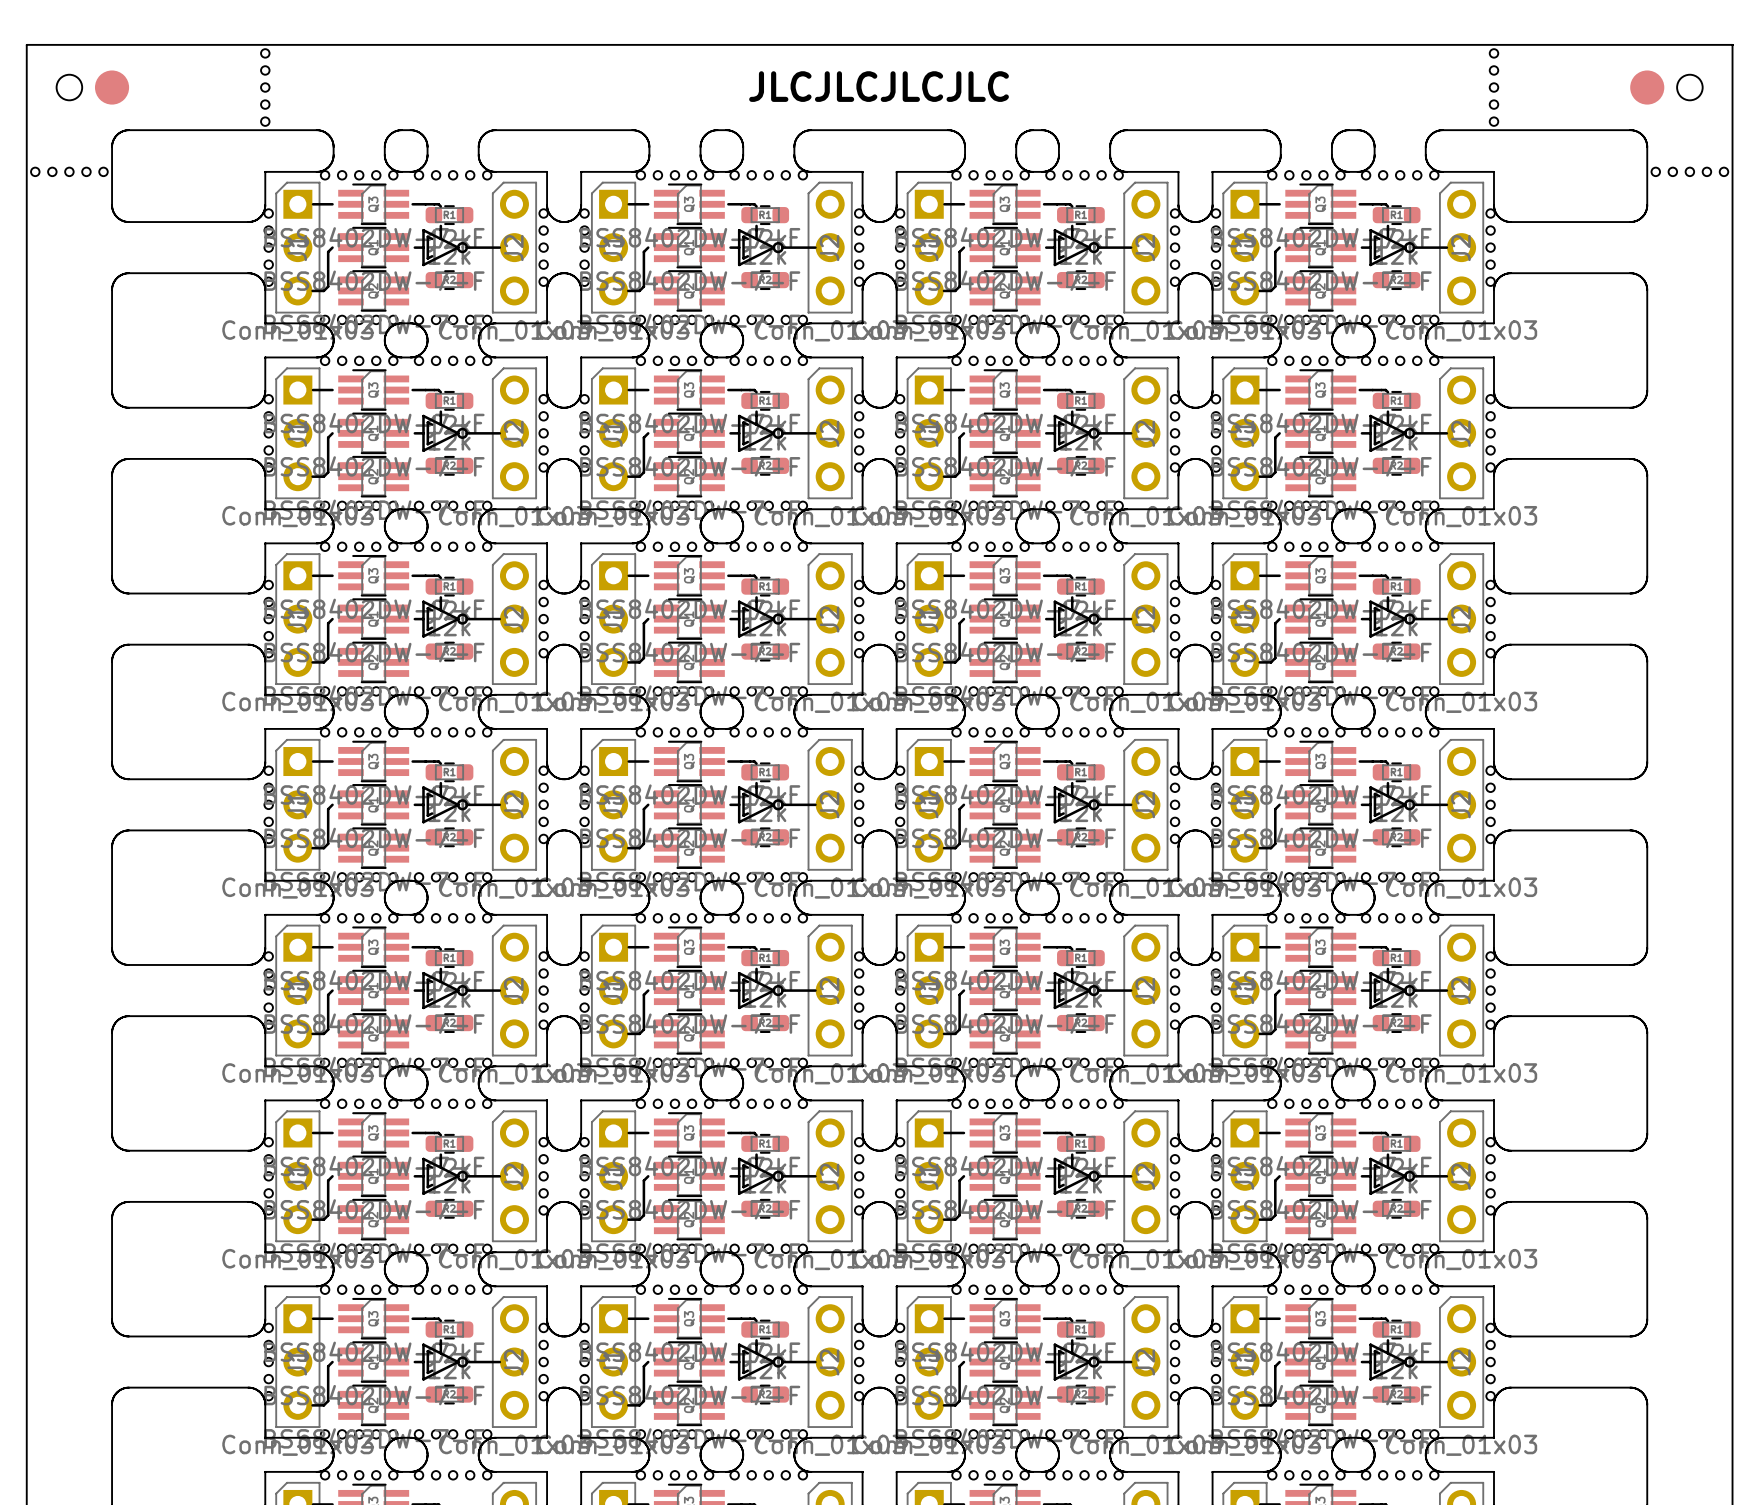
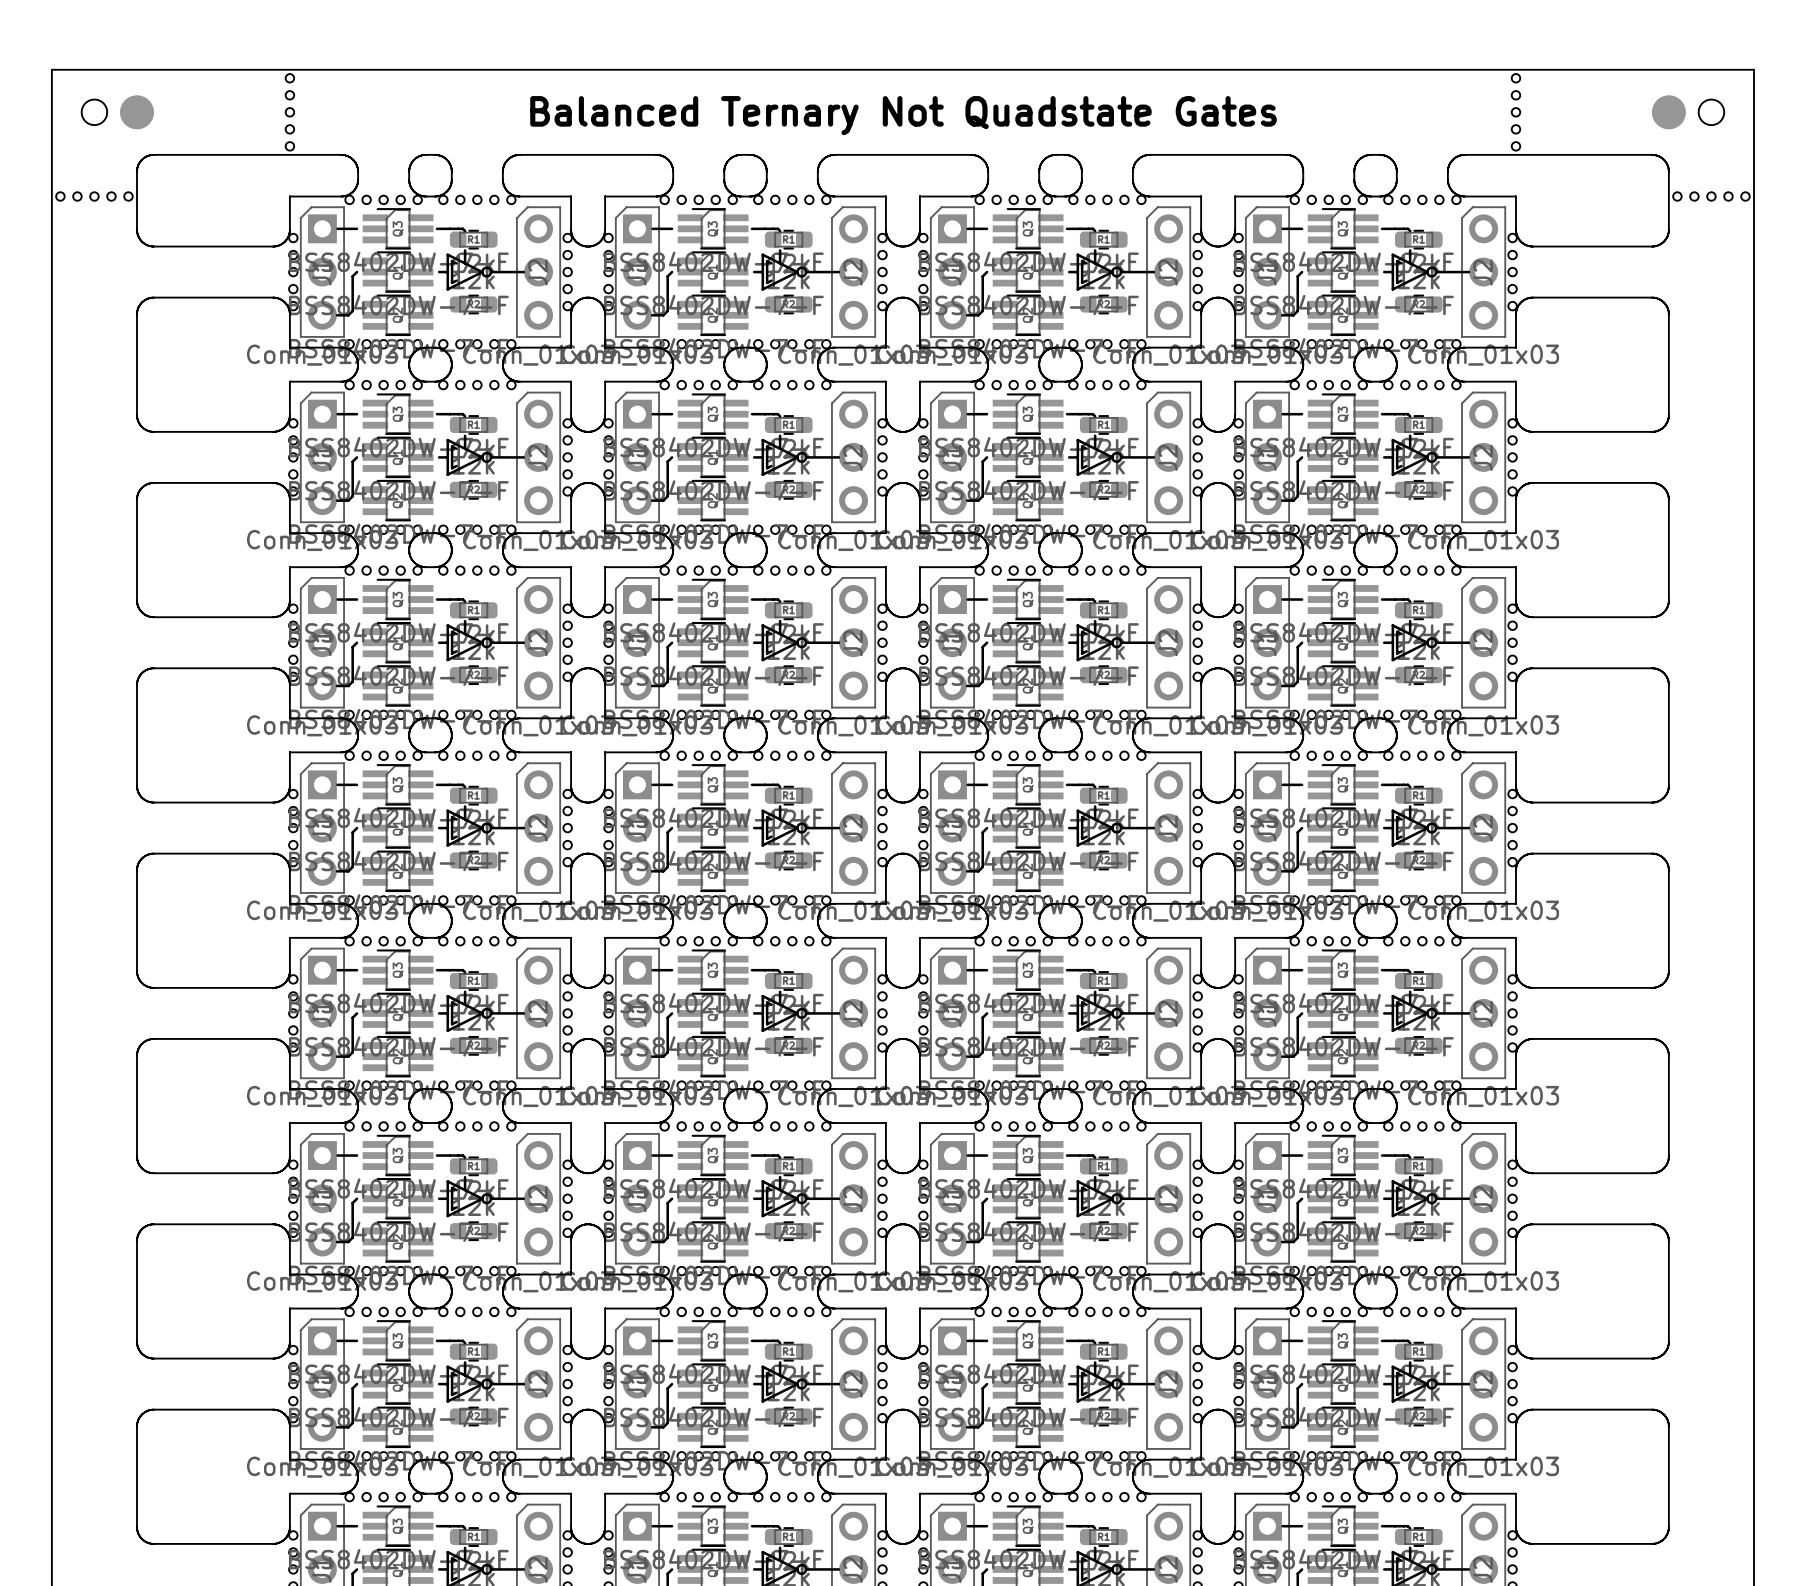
text: JLCJLCJLCJLC (879, 86) -> Balanced Ternary Not Quadstate Gates (903, 115)

